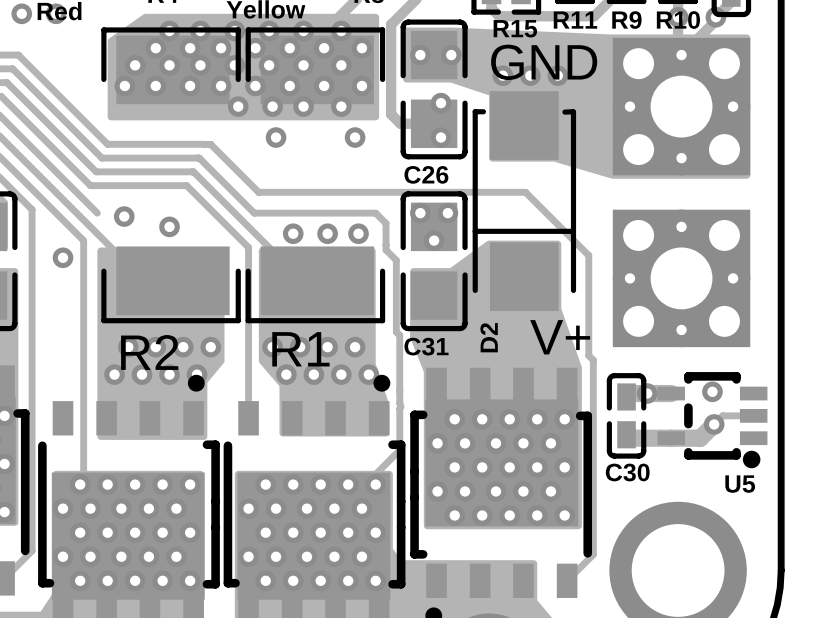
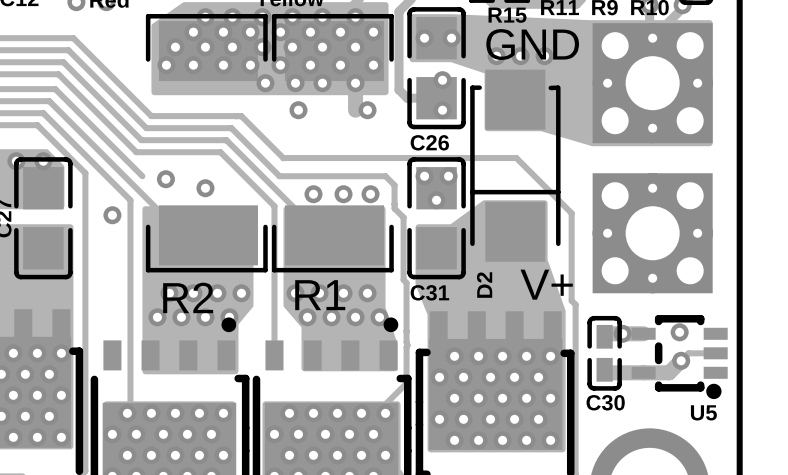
track: none -> (355, 83) (355, 110)

